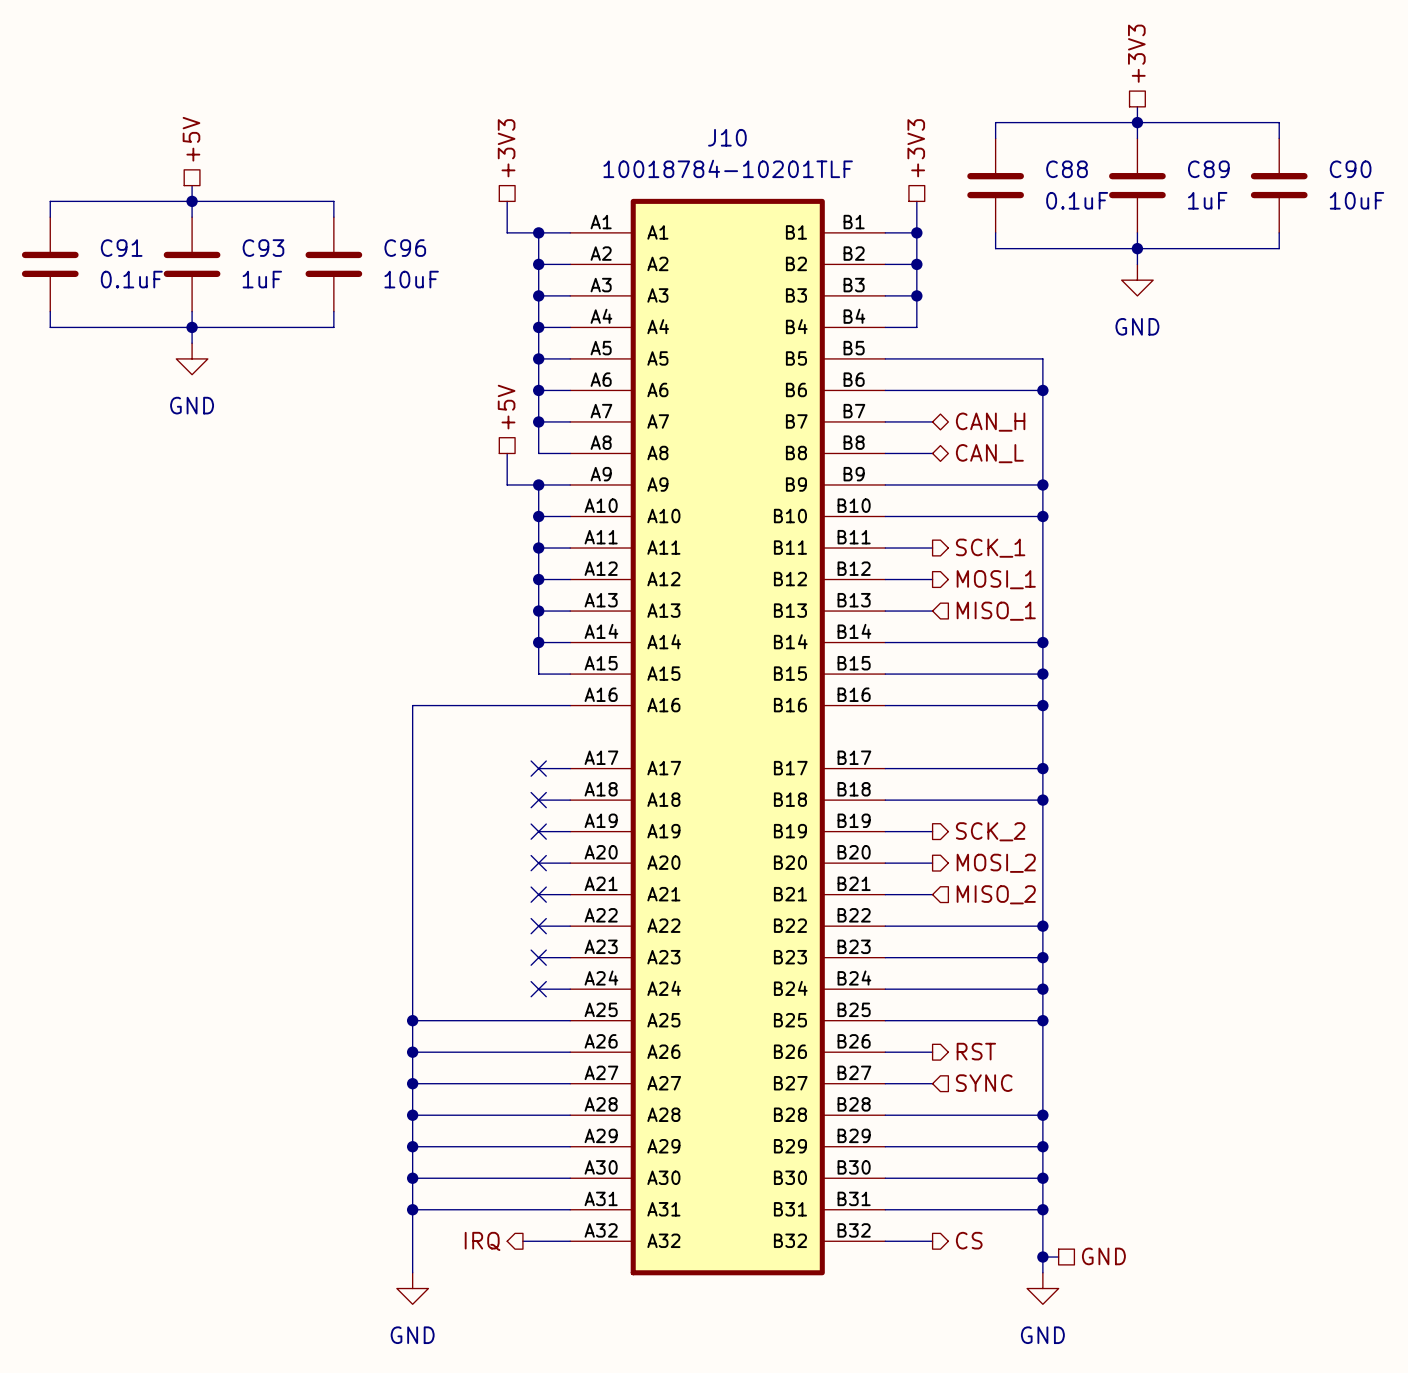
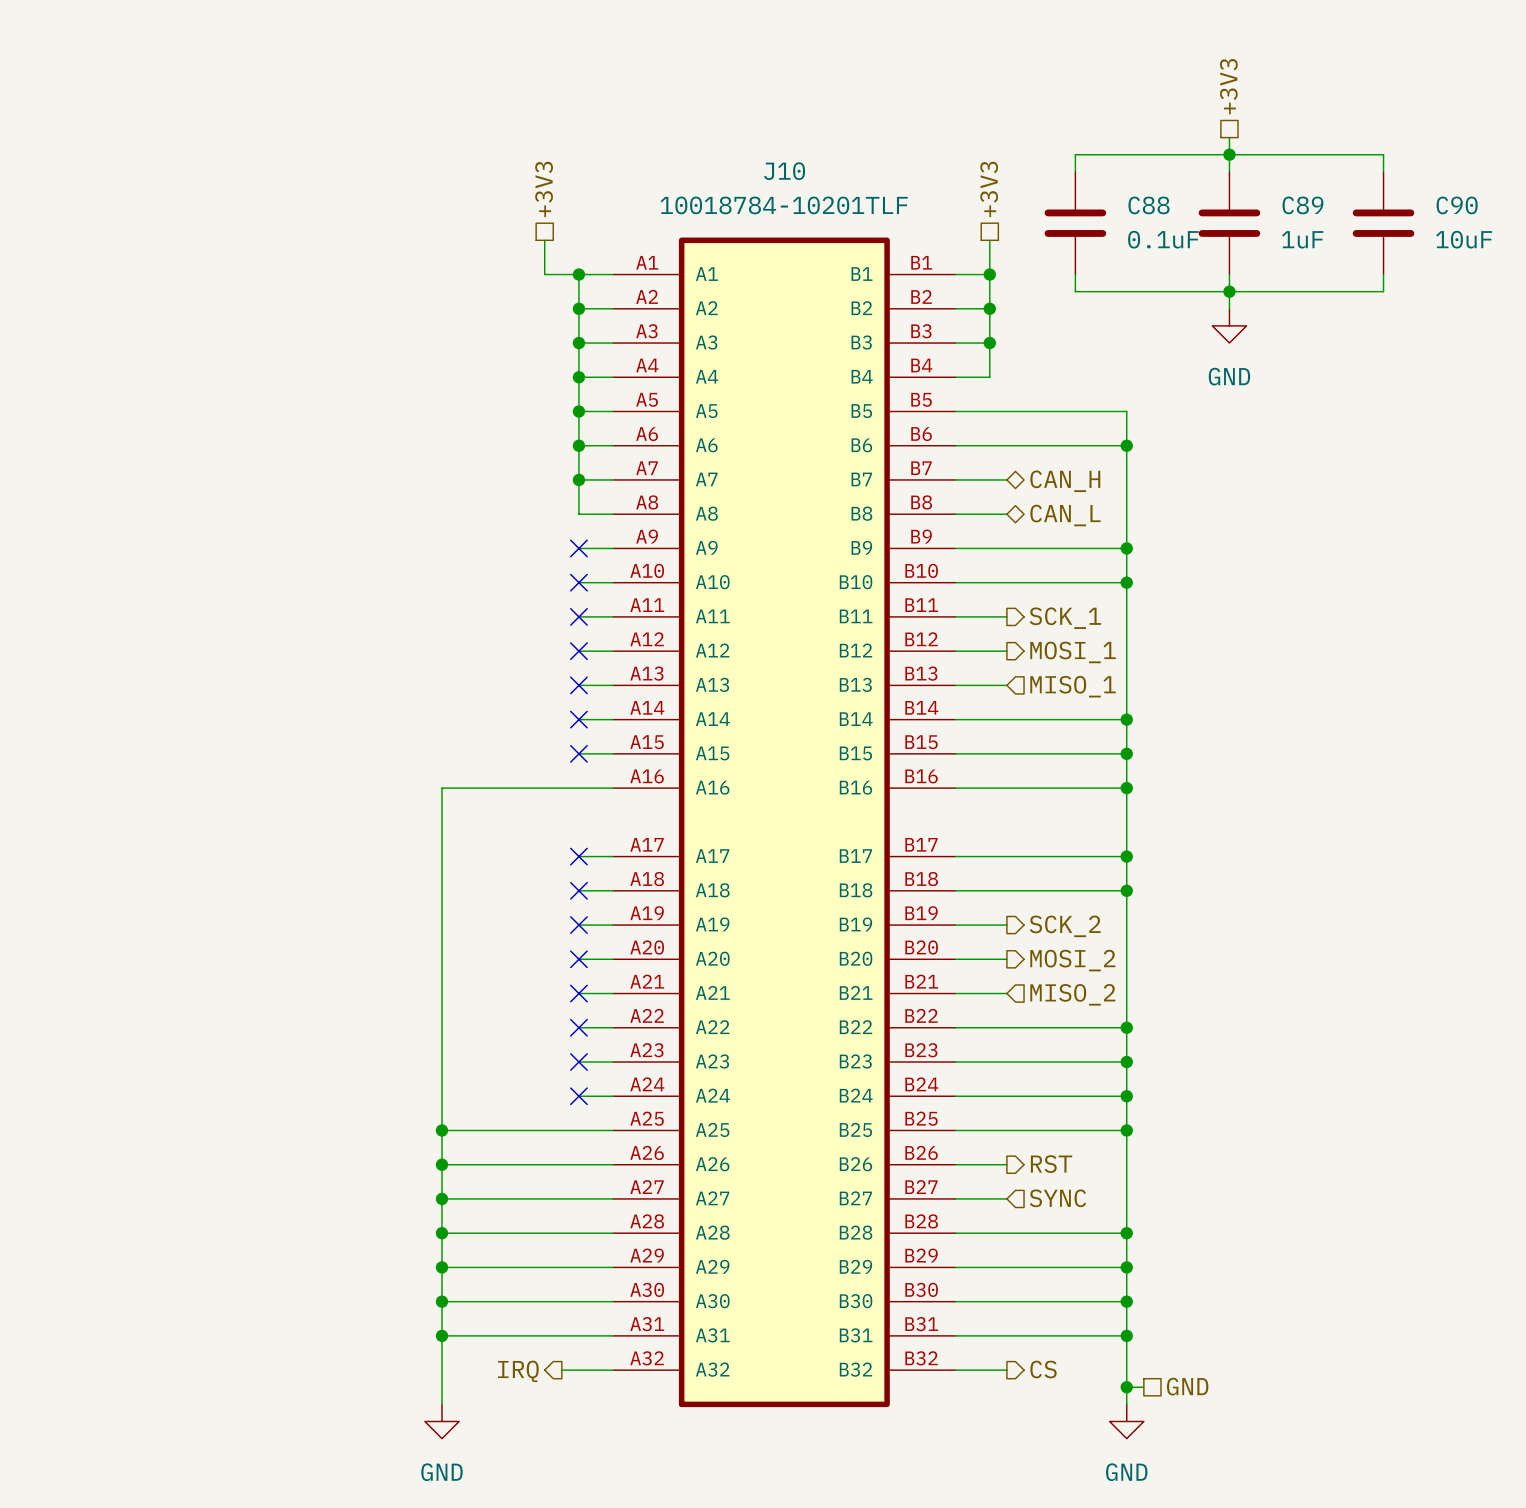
hierarchical label: +5V (191, 139) -> none
wire: (192, 185) (192, 217) -> none
junction: (192, 201) -> none
wire: (50, 217) (50, 201) (333, 201) (333, 217) -> none
C91: 0.1uF (50, 264) -> none
C93: 1uF (192, 264) -> none
C96: 10uF (333, 264) -> none
wire: (50, 311) (50, 327) (333, 327) (333, 311) -> none
wire: (192, 311) (192, 343) -> none
junction: (192, 327) -> none
power symbol: GND (192, 358) -> none
hierarchical label: +5V (506, 407) -> none
wire: (507, 453) (507, 484) (538, 484) (538, 674) -> none
junction: (538, 484) -> none
no-connect mark: none -> (578, 548)
junction: (538, 516) -> none
no-connect mark: none -> (578, 582)
junction: (538, 548) -> none
no-connect mark: none -> (578, 616)
junction: (538, 579) -> none
no-connect mark: none -> (578, 651)
junction: (538, 611) -> none
no-connect mark: none -> (578, 685)
junction: (538, 642) -> none
no-connect mark: none -> (578, 719)
no-connect mark: none -> (578, 753)

